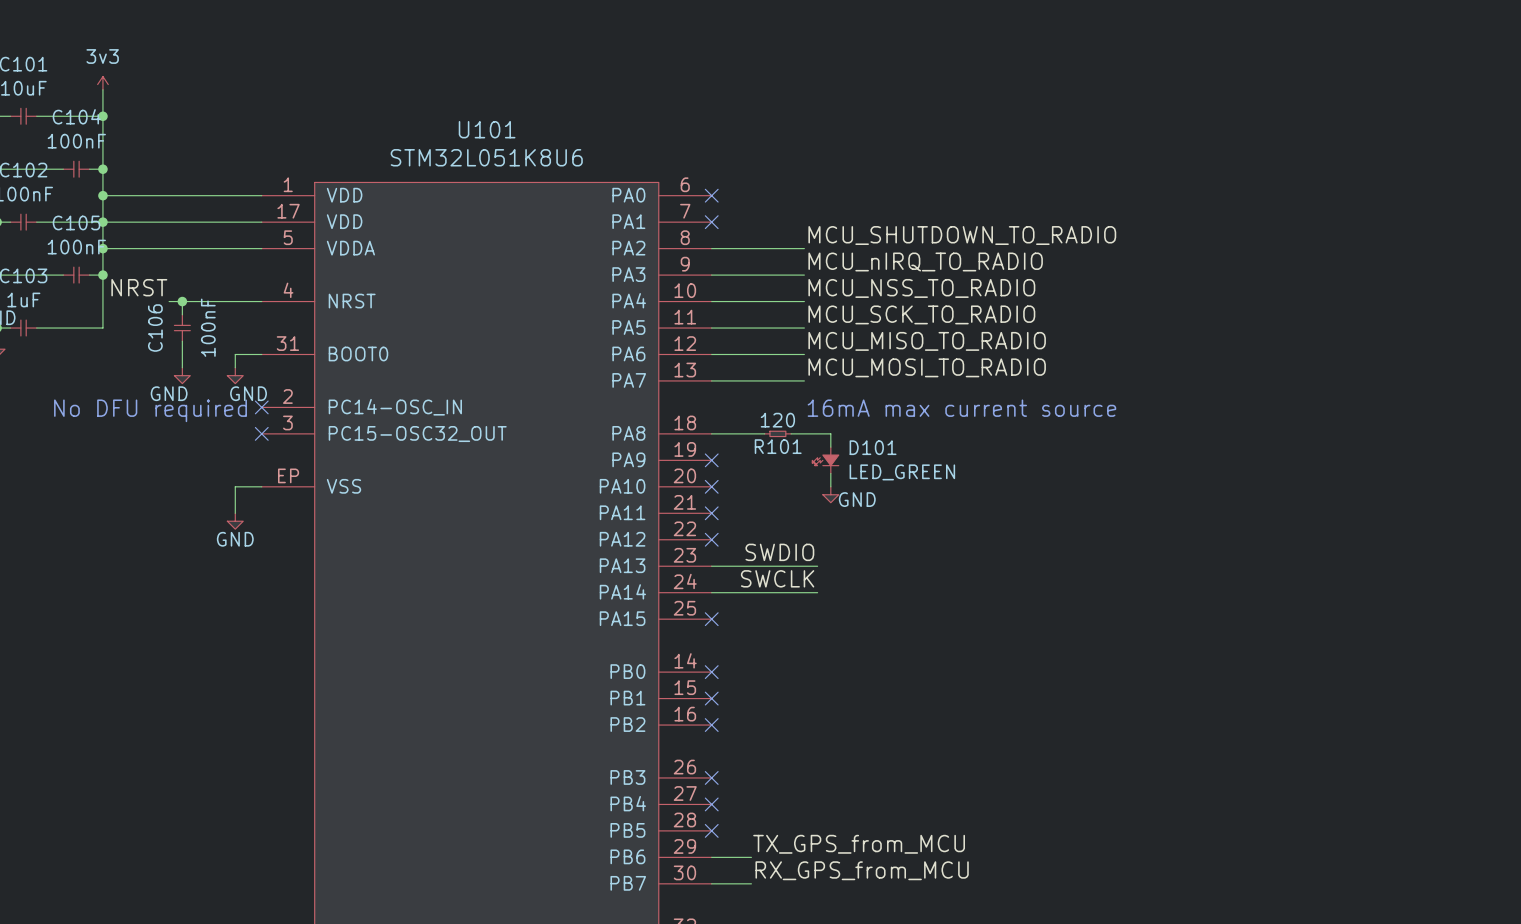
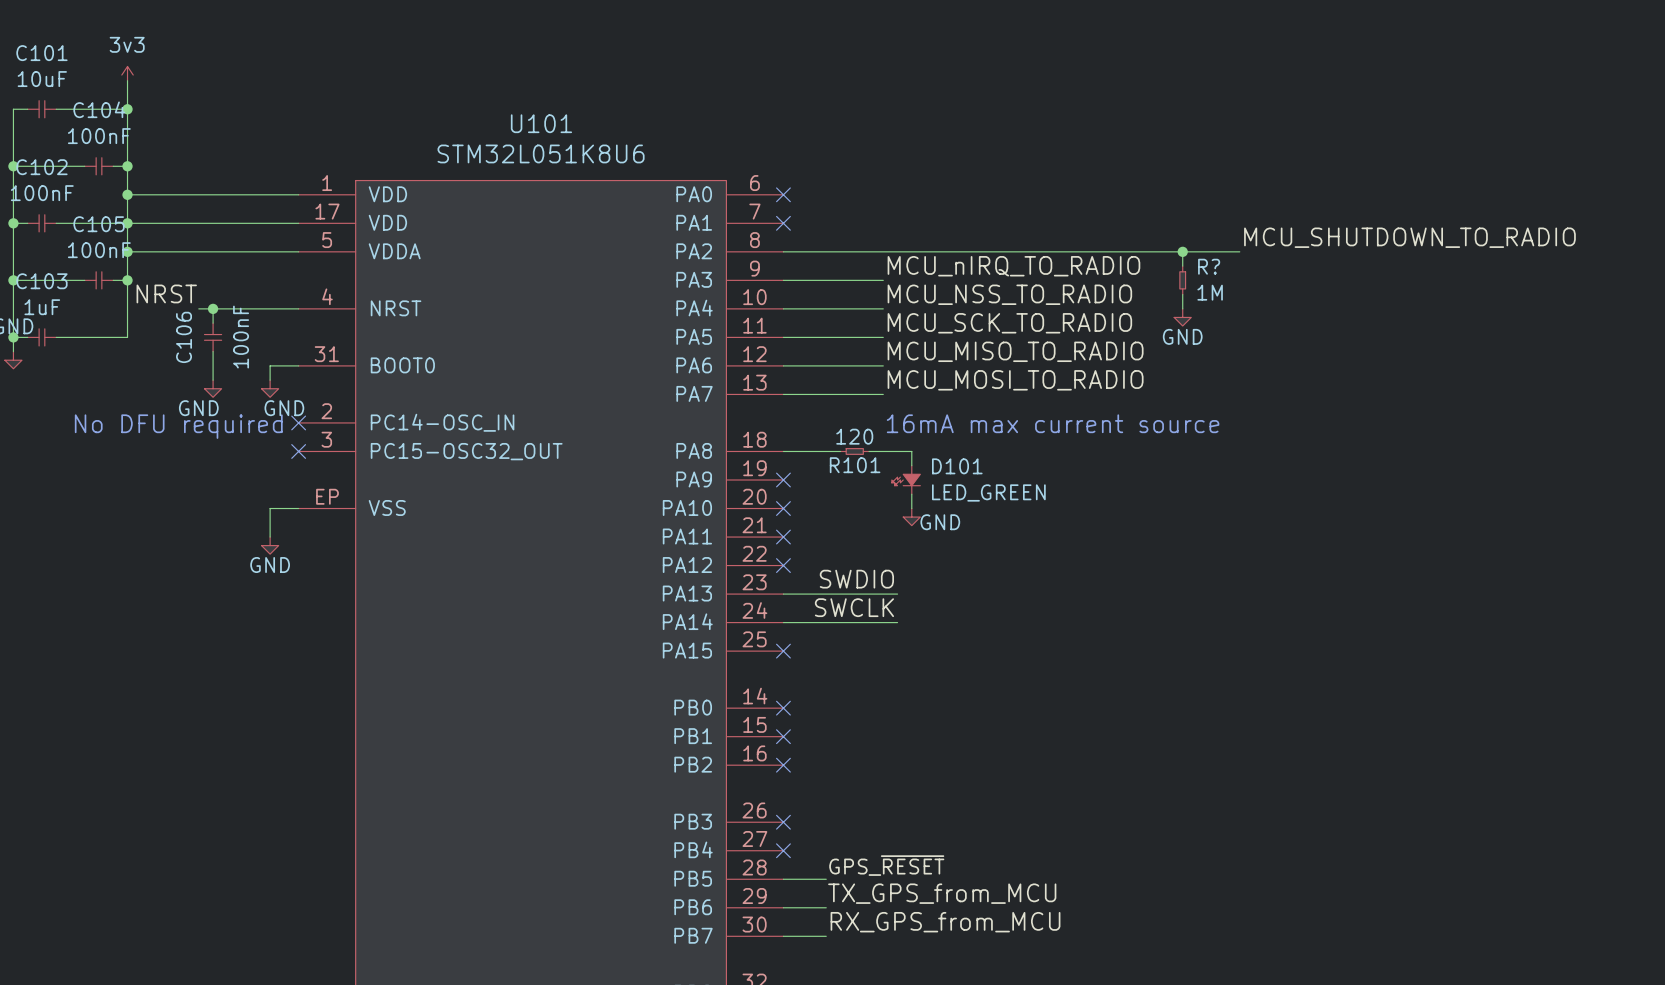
label: MCU_SHUTDOWN_TO_RADIO (962, 235) -> none
label: none -> MCU_SHUTDOWN_TO_RADIO (1409, 237)
wire: none -> (883, 251) (1239, 251)
wire: none -> (1182, 251) (1182, 266)
junction: none -> (1182, 251)
R?: none -> 1M (1182, 280)
wire: none -> (1182, 294) (1182, 308)
power symbol: none -> GND (1182, 317)
label: none -> GPS_~{RESET} (886, 865)
wire: none -> (783, 879) (826, 879)
no-connect mark: (711, 830) -> none

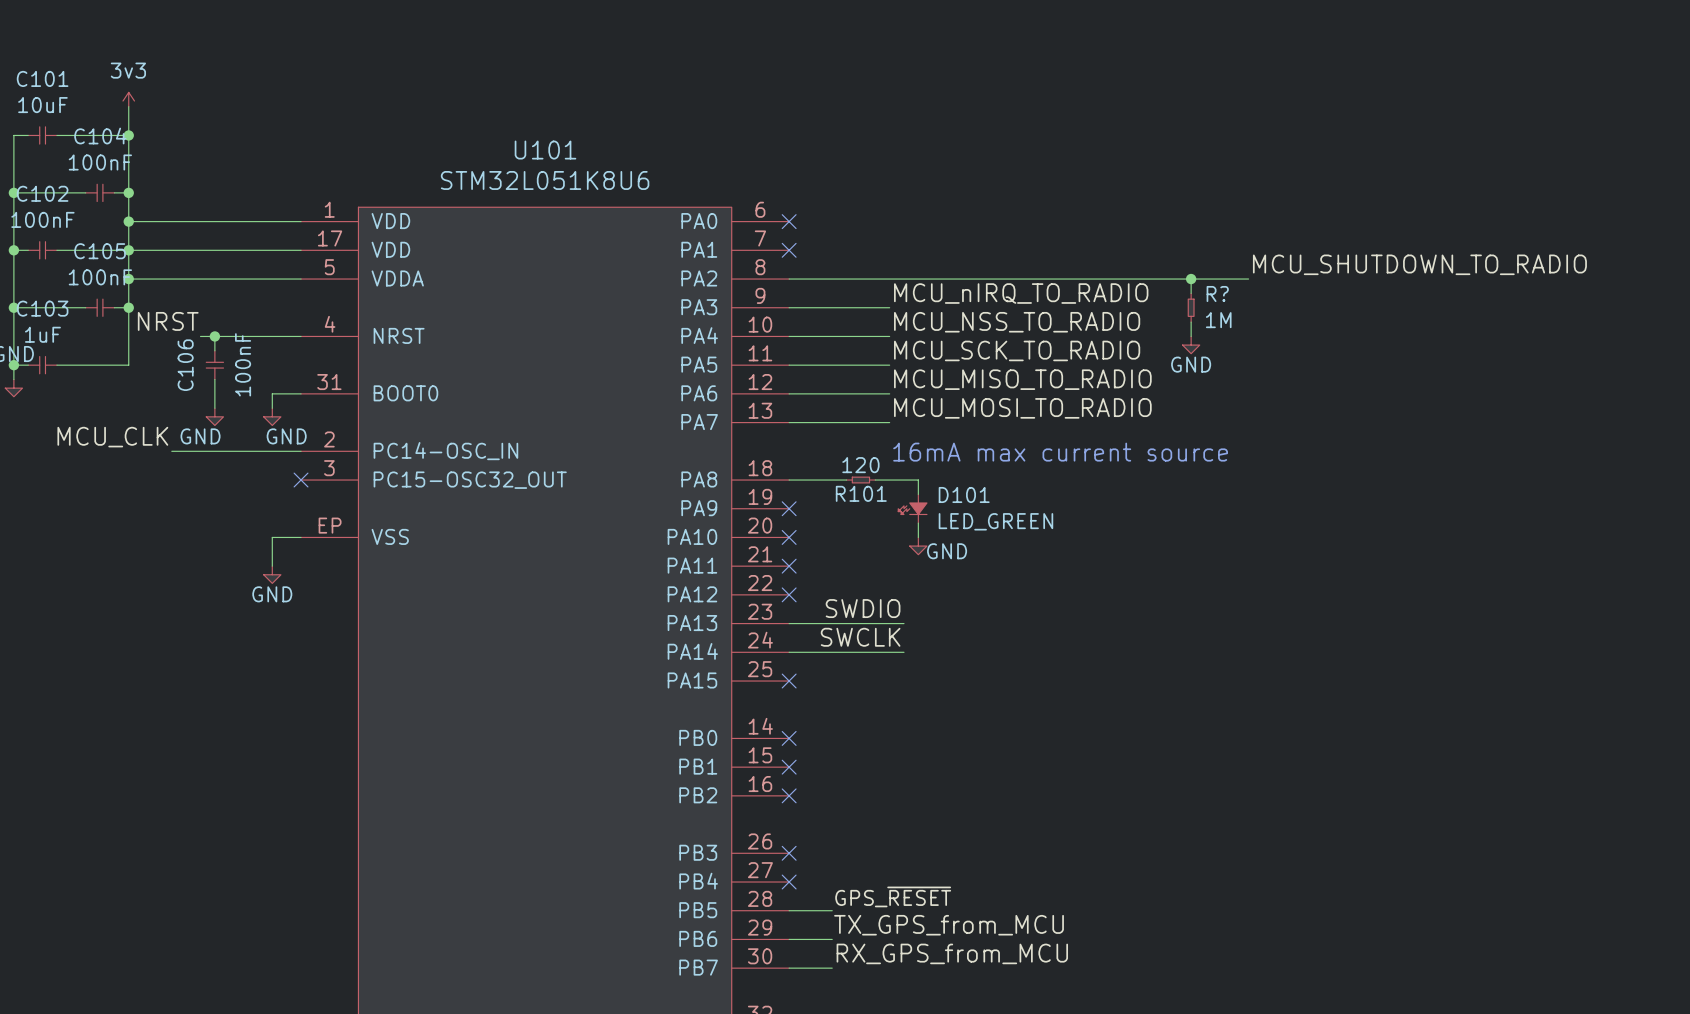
label: none -> MCU_CLK (112, 437)
wire: none -> (171, 451) (301, 451)
no-connect mark: (298, 422) -> none
text: No DFU required (178, 426) -> none

